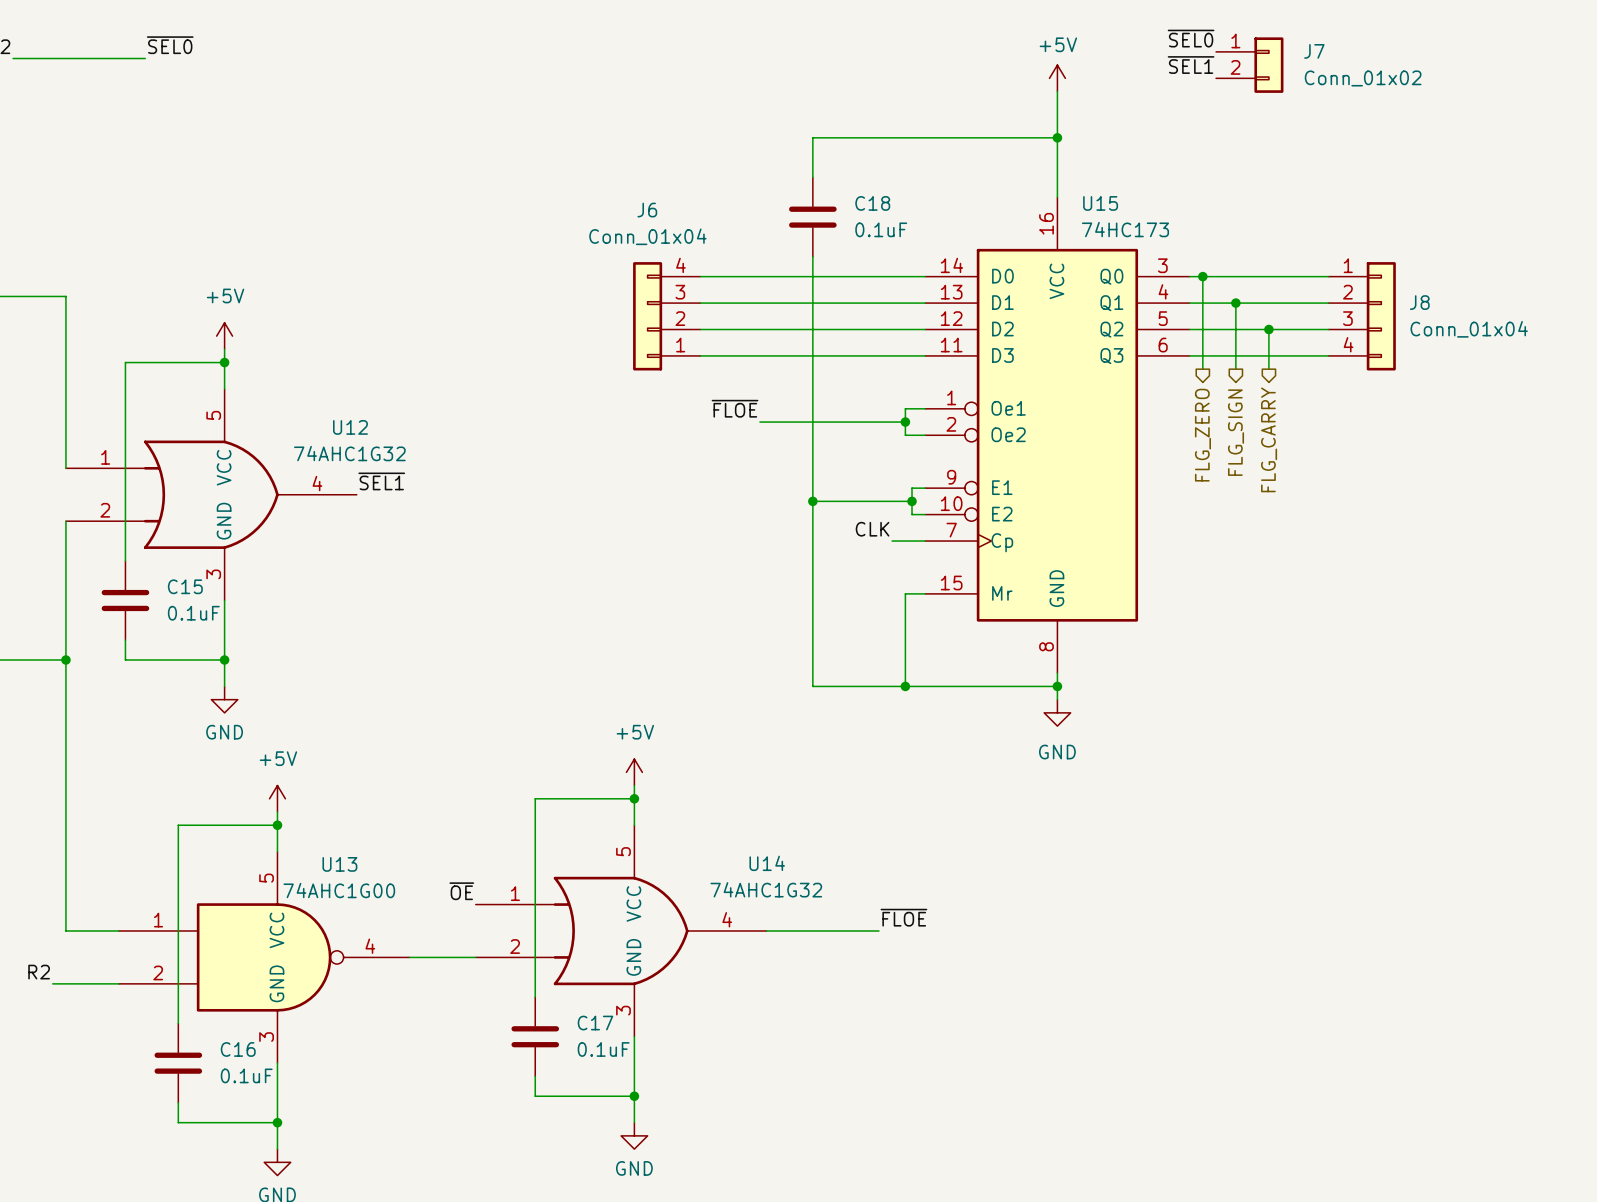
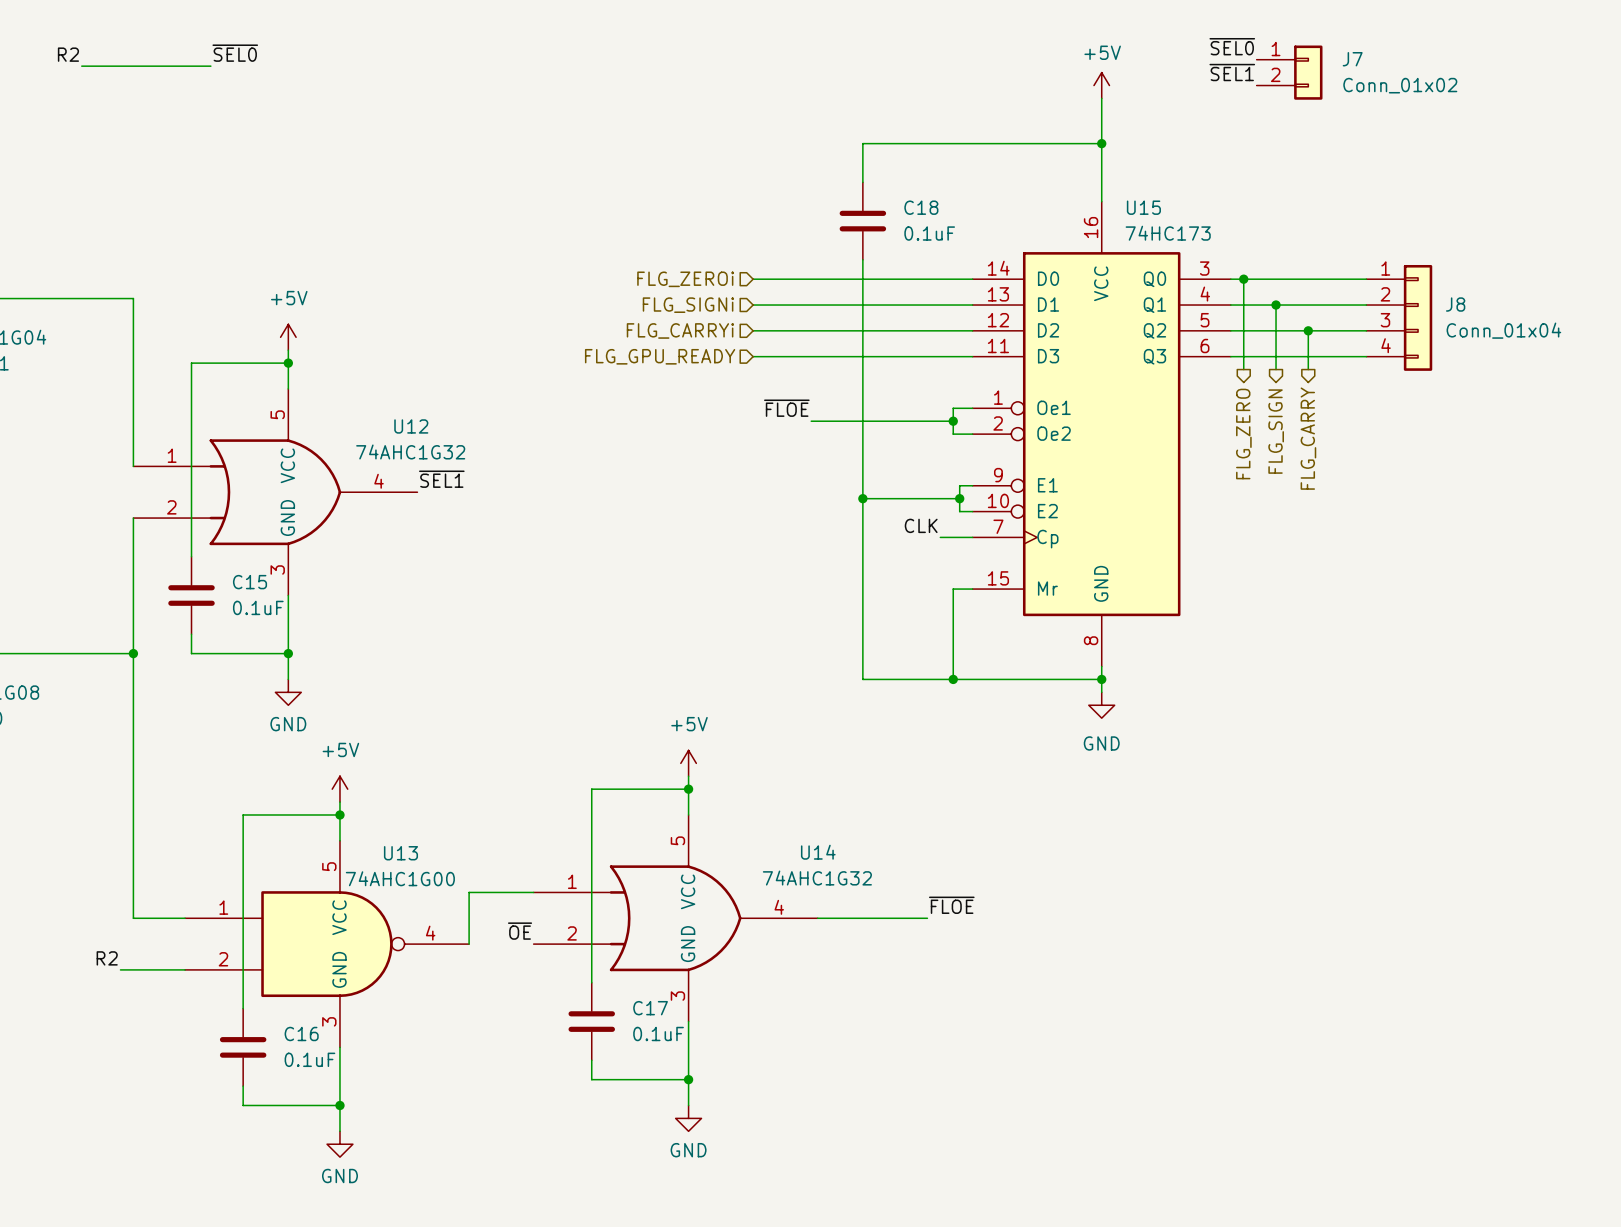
hierarchical label: none -> FLG_ZEROi (685, 279)
hierarchical label: none -> FLG_SIGNi (688, 305)
J6: Conn_01x04 (666, 316) -> none
hierarchical label: none -> FLG_CARRYi (680, 330)
hierarchical label: none -> FLG_GPU_READY (660, 356)
label position: ~{OE} (461, 891) -> ~{OE} (520, 931)
wire: (409, 957) (475, 957) -> (469, 944) (469, 892) (533, 892)

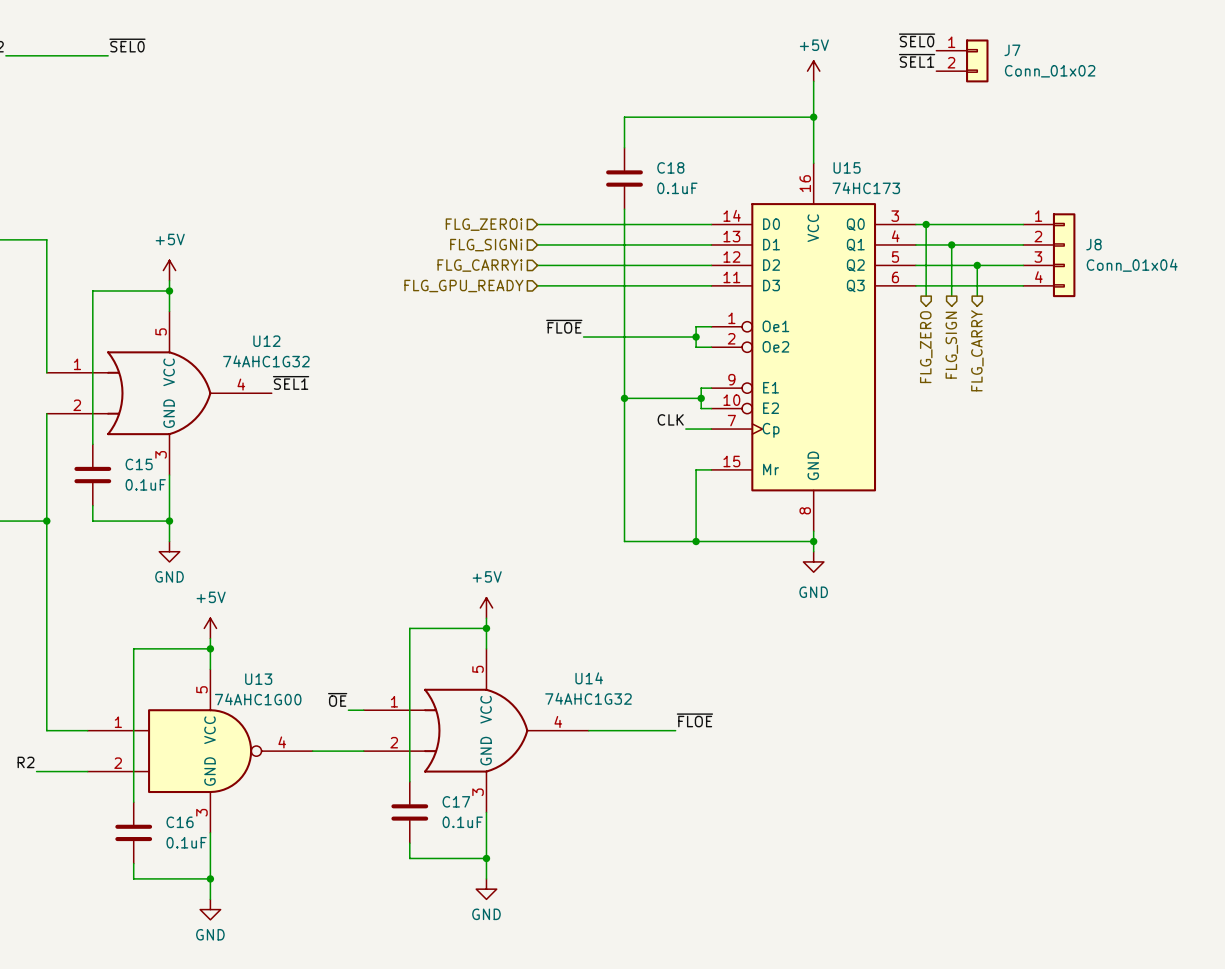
wire: (514, 892) (469, 892) (469, 944) -> (363, 751) (312, 751)
label position: ~{OE} (520, 931) -> ~{OE} (337, 699)

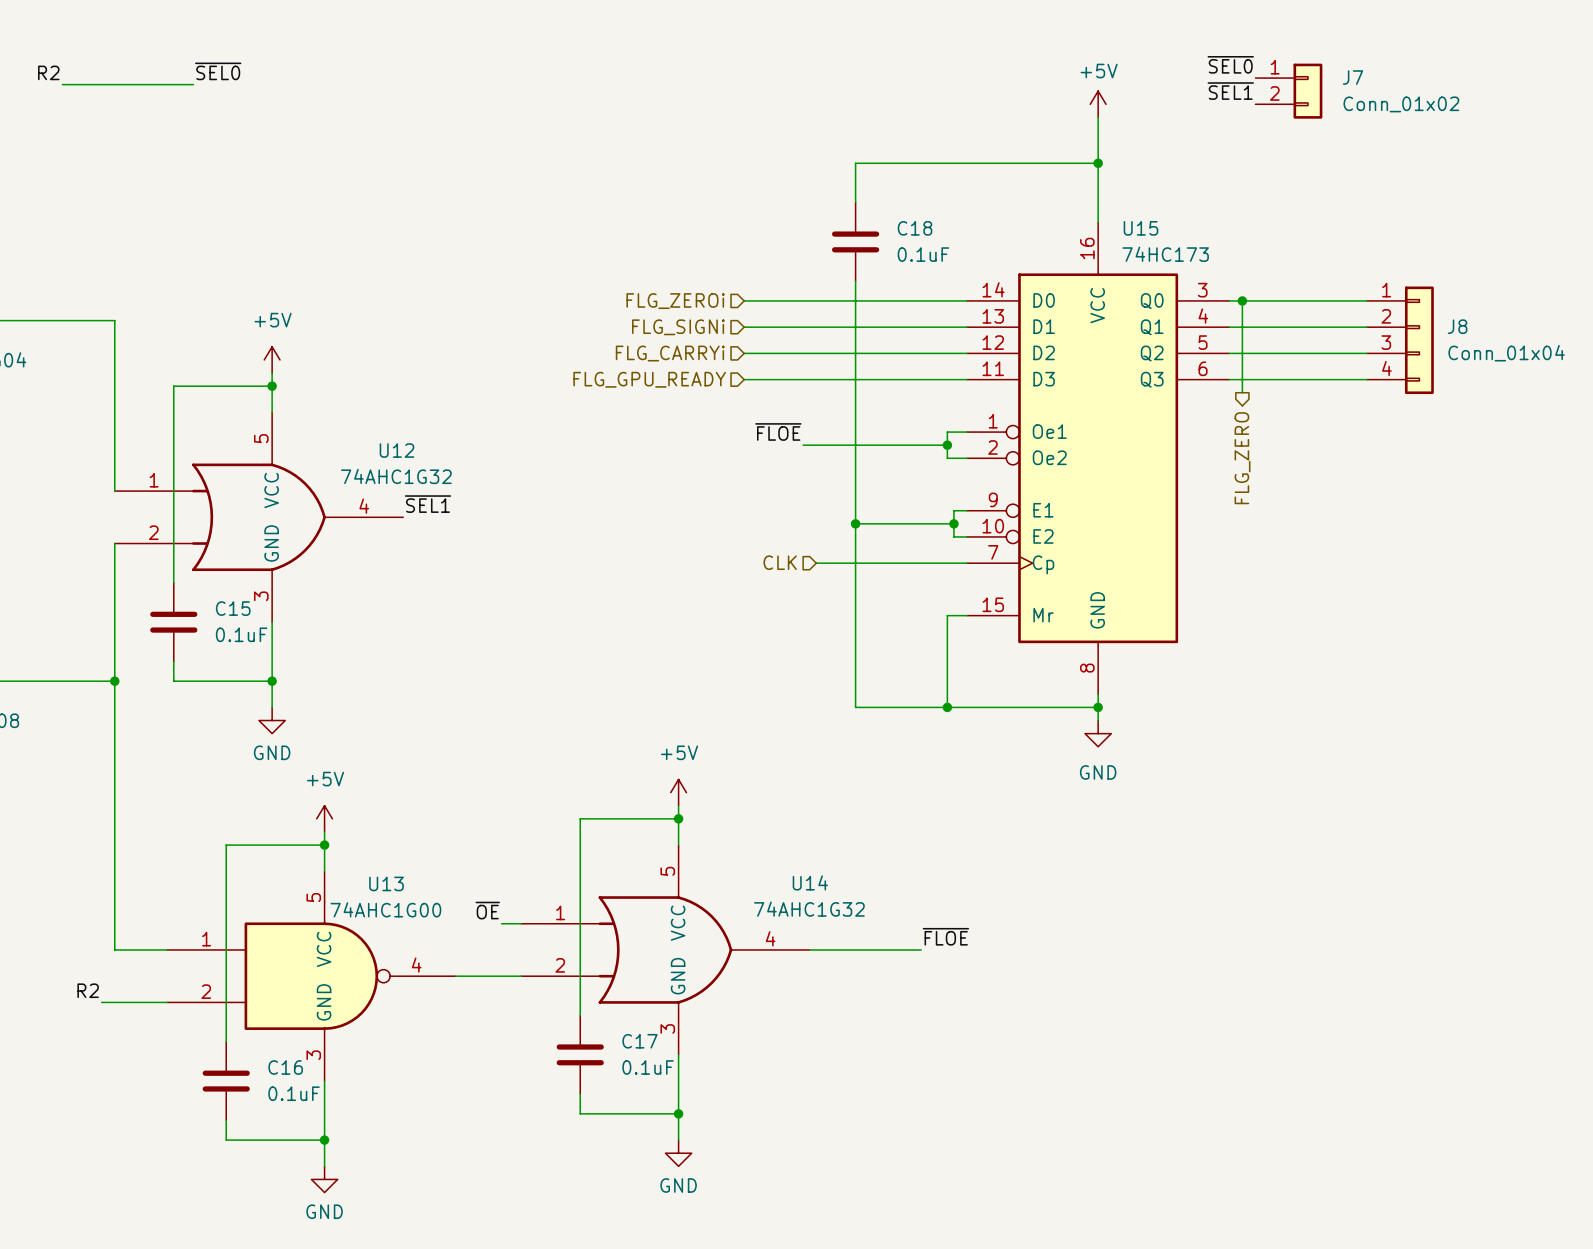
wire: (951, 244) (951, 296) -> none
junction: (951, 244) -> none
wire: (977, 265) (977, 296) -> none
junction: (977, 265) -> none
hierarchical label: FLG_SIGN (951, 345) -> none
hierarchical label: FLG_CARRY (977, 350) -> none
label: CLK (670, 419) -> none
hierarchical label: none -> CLK (780, 562)
wire: none -> (816, 563) (934, 563)

